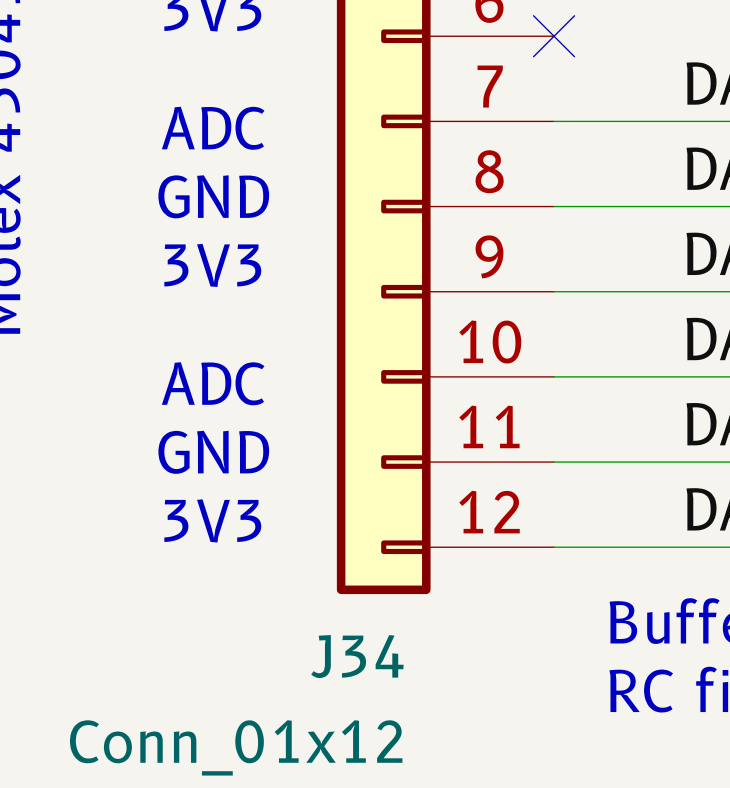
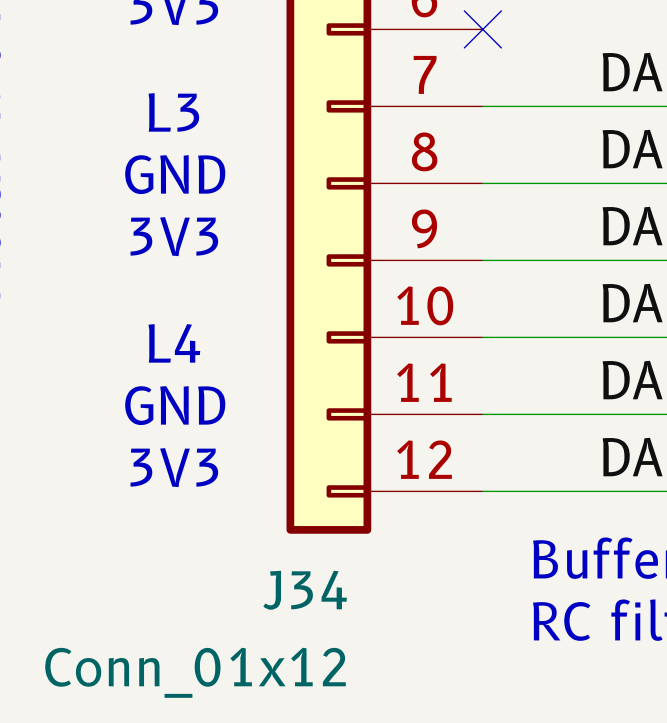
text: ADC (213, 128) -> L3 (173, 112)
text: ADC (213, 383) -> L4 (174, 343)

